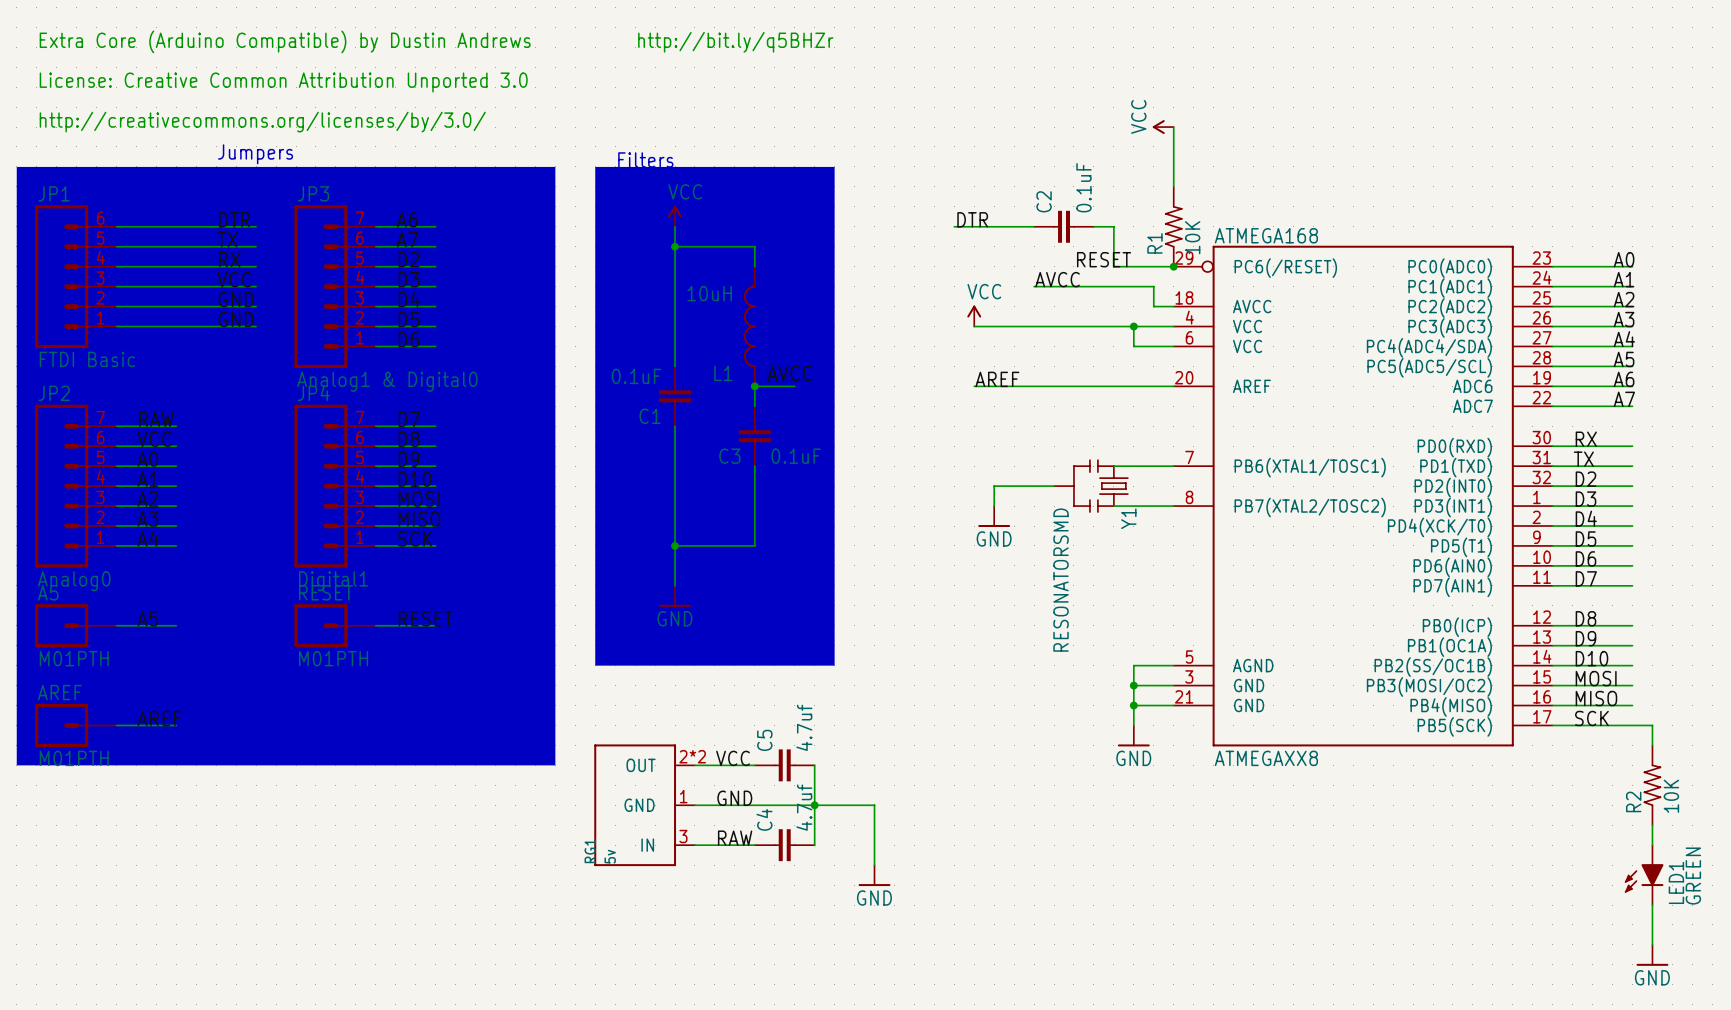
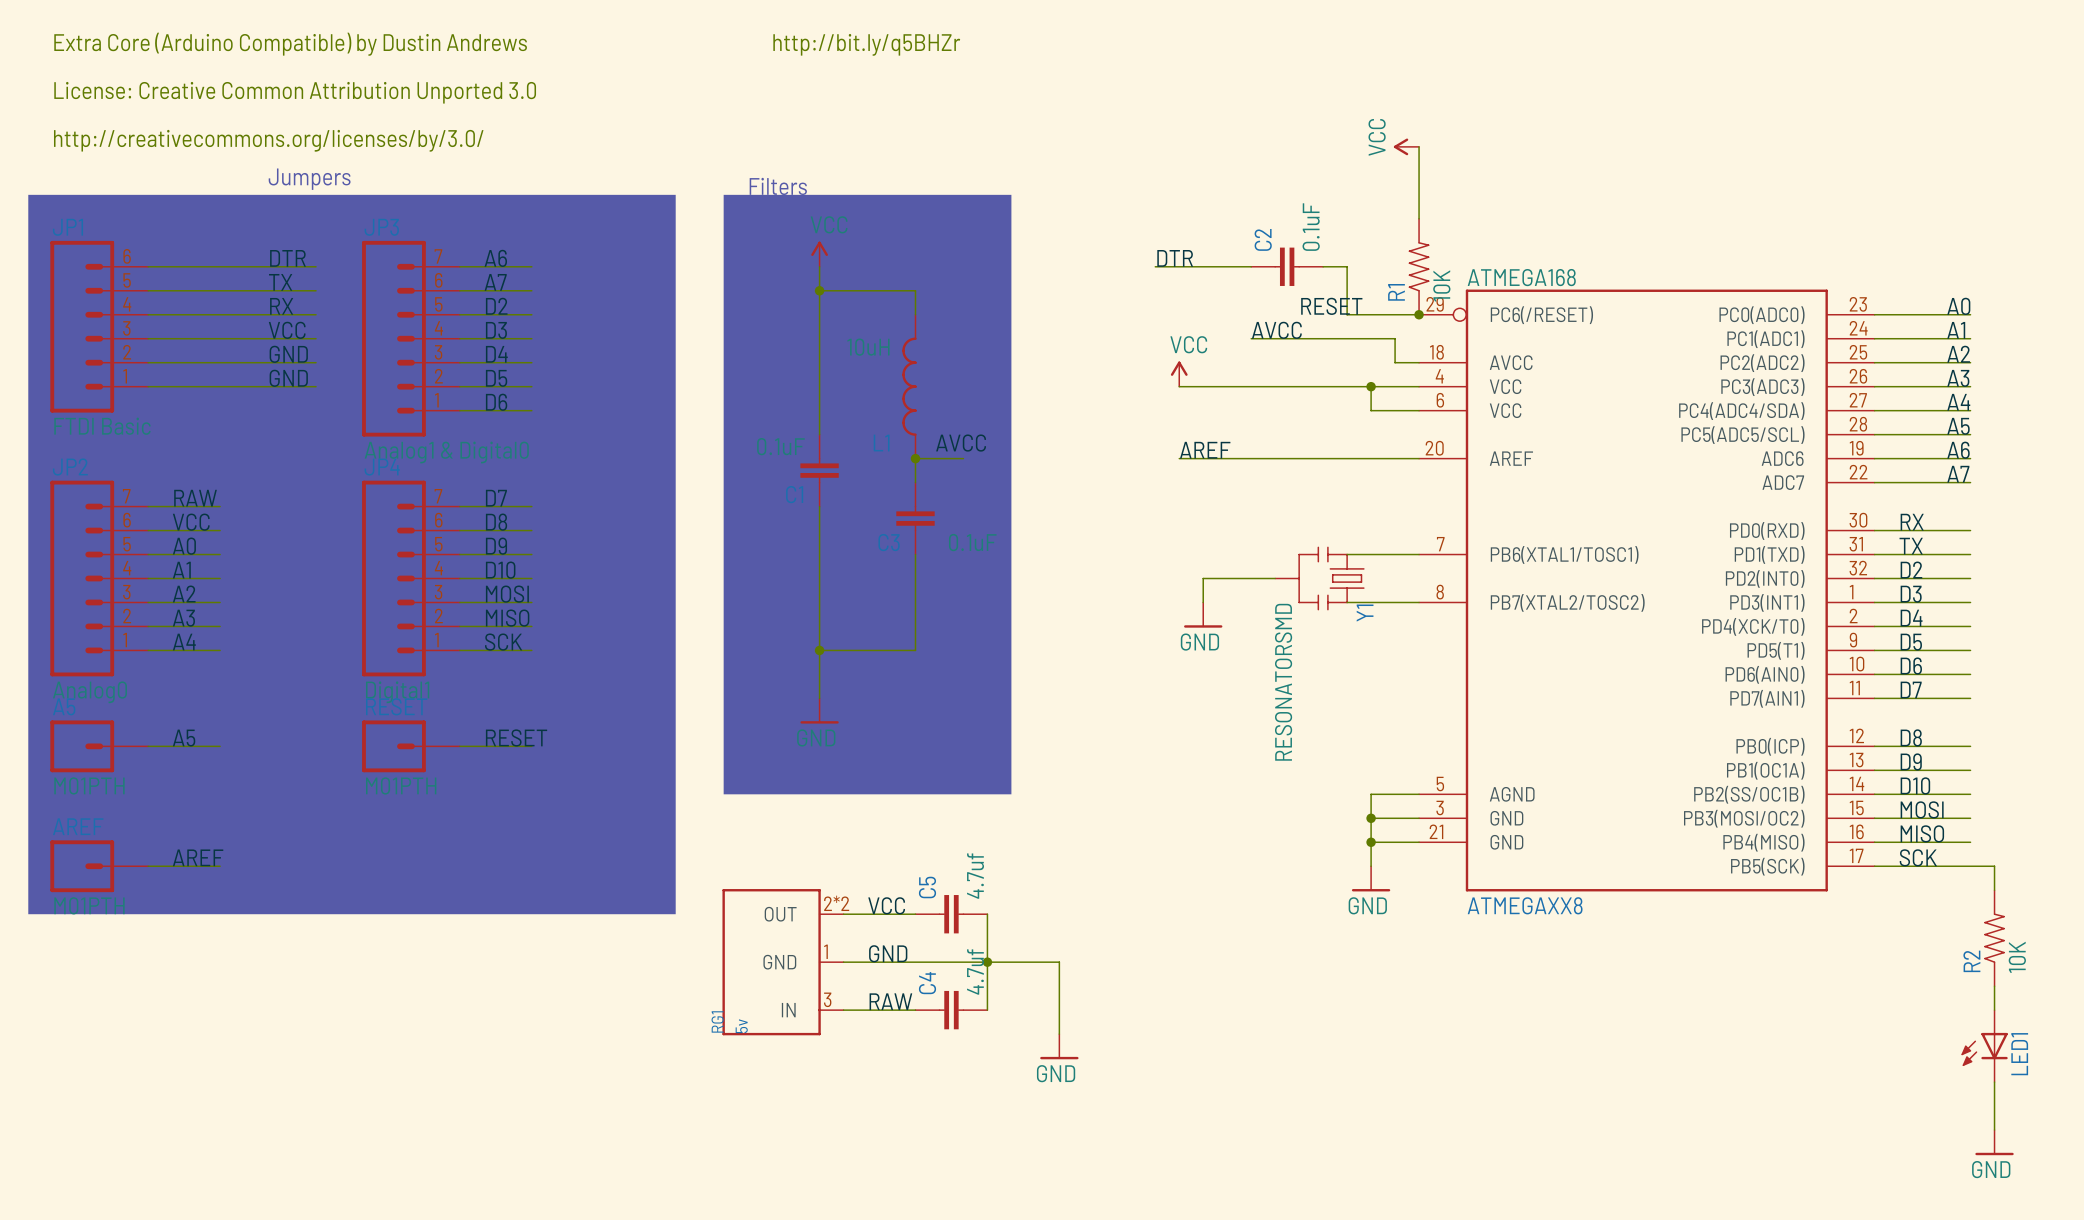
LED1 symbol: [1624, 844, 1664, 906] -> [1961, 1010, 2008, 1083]
LED1 value: GREEN (1693, 876) -> none

